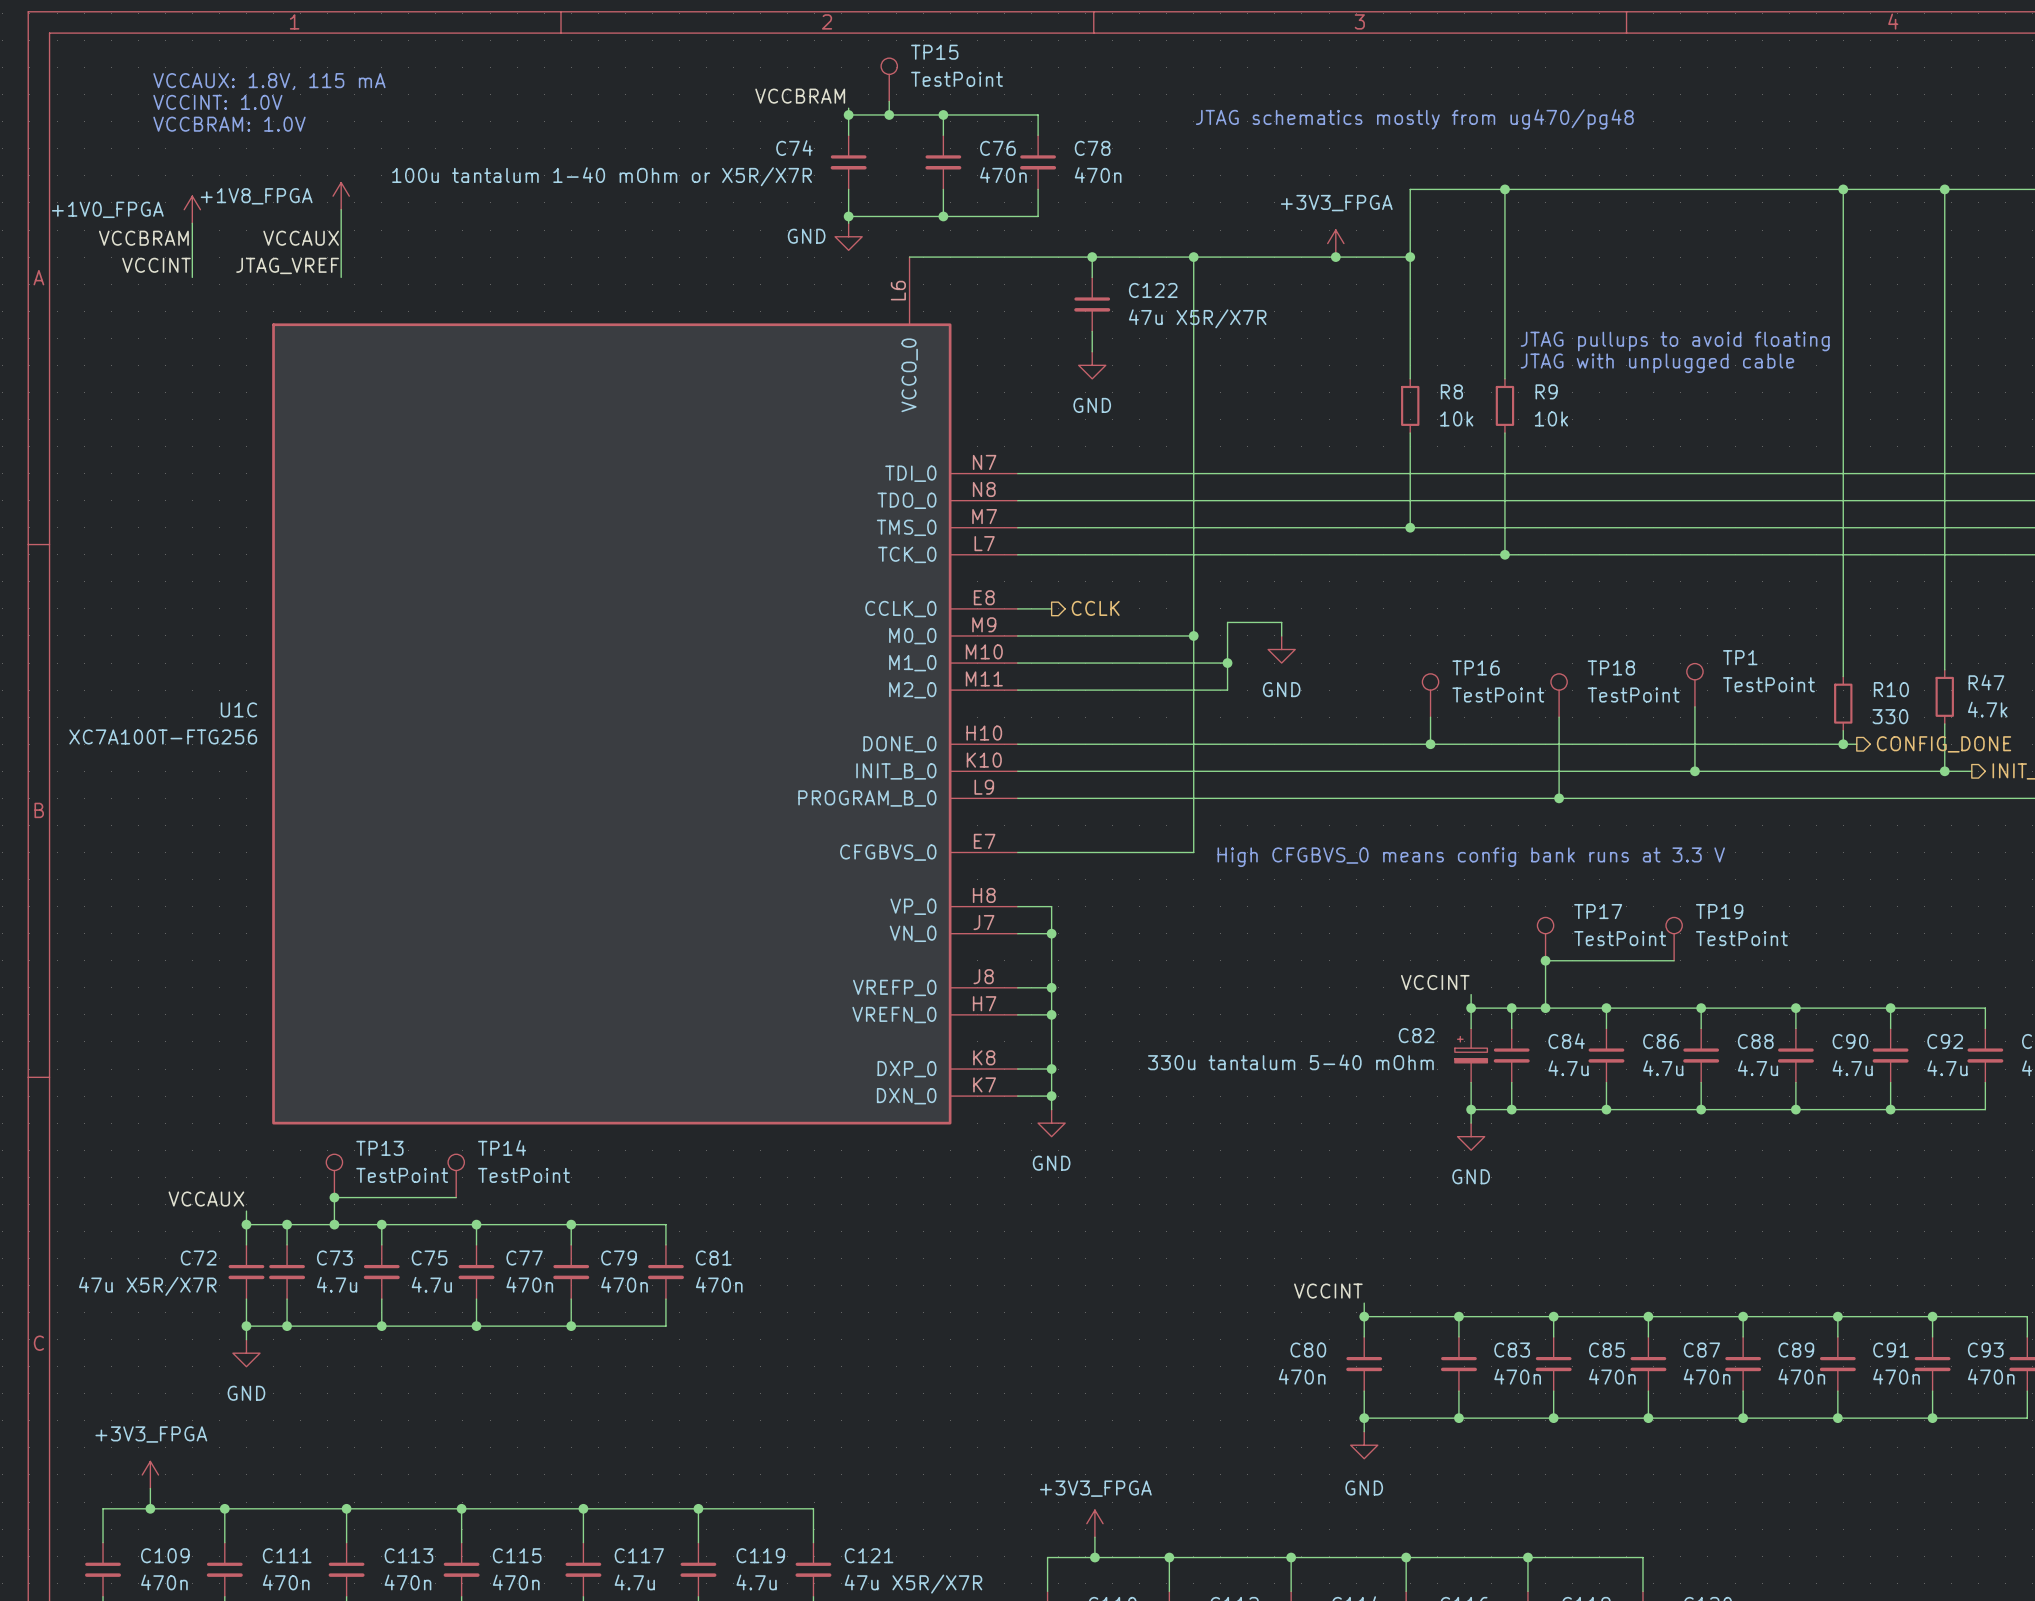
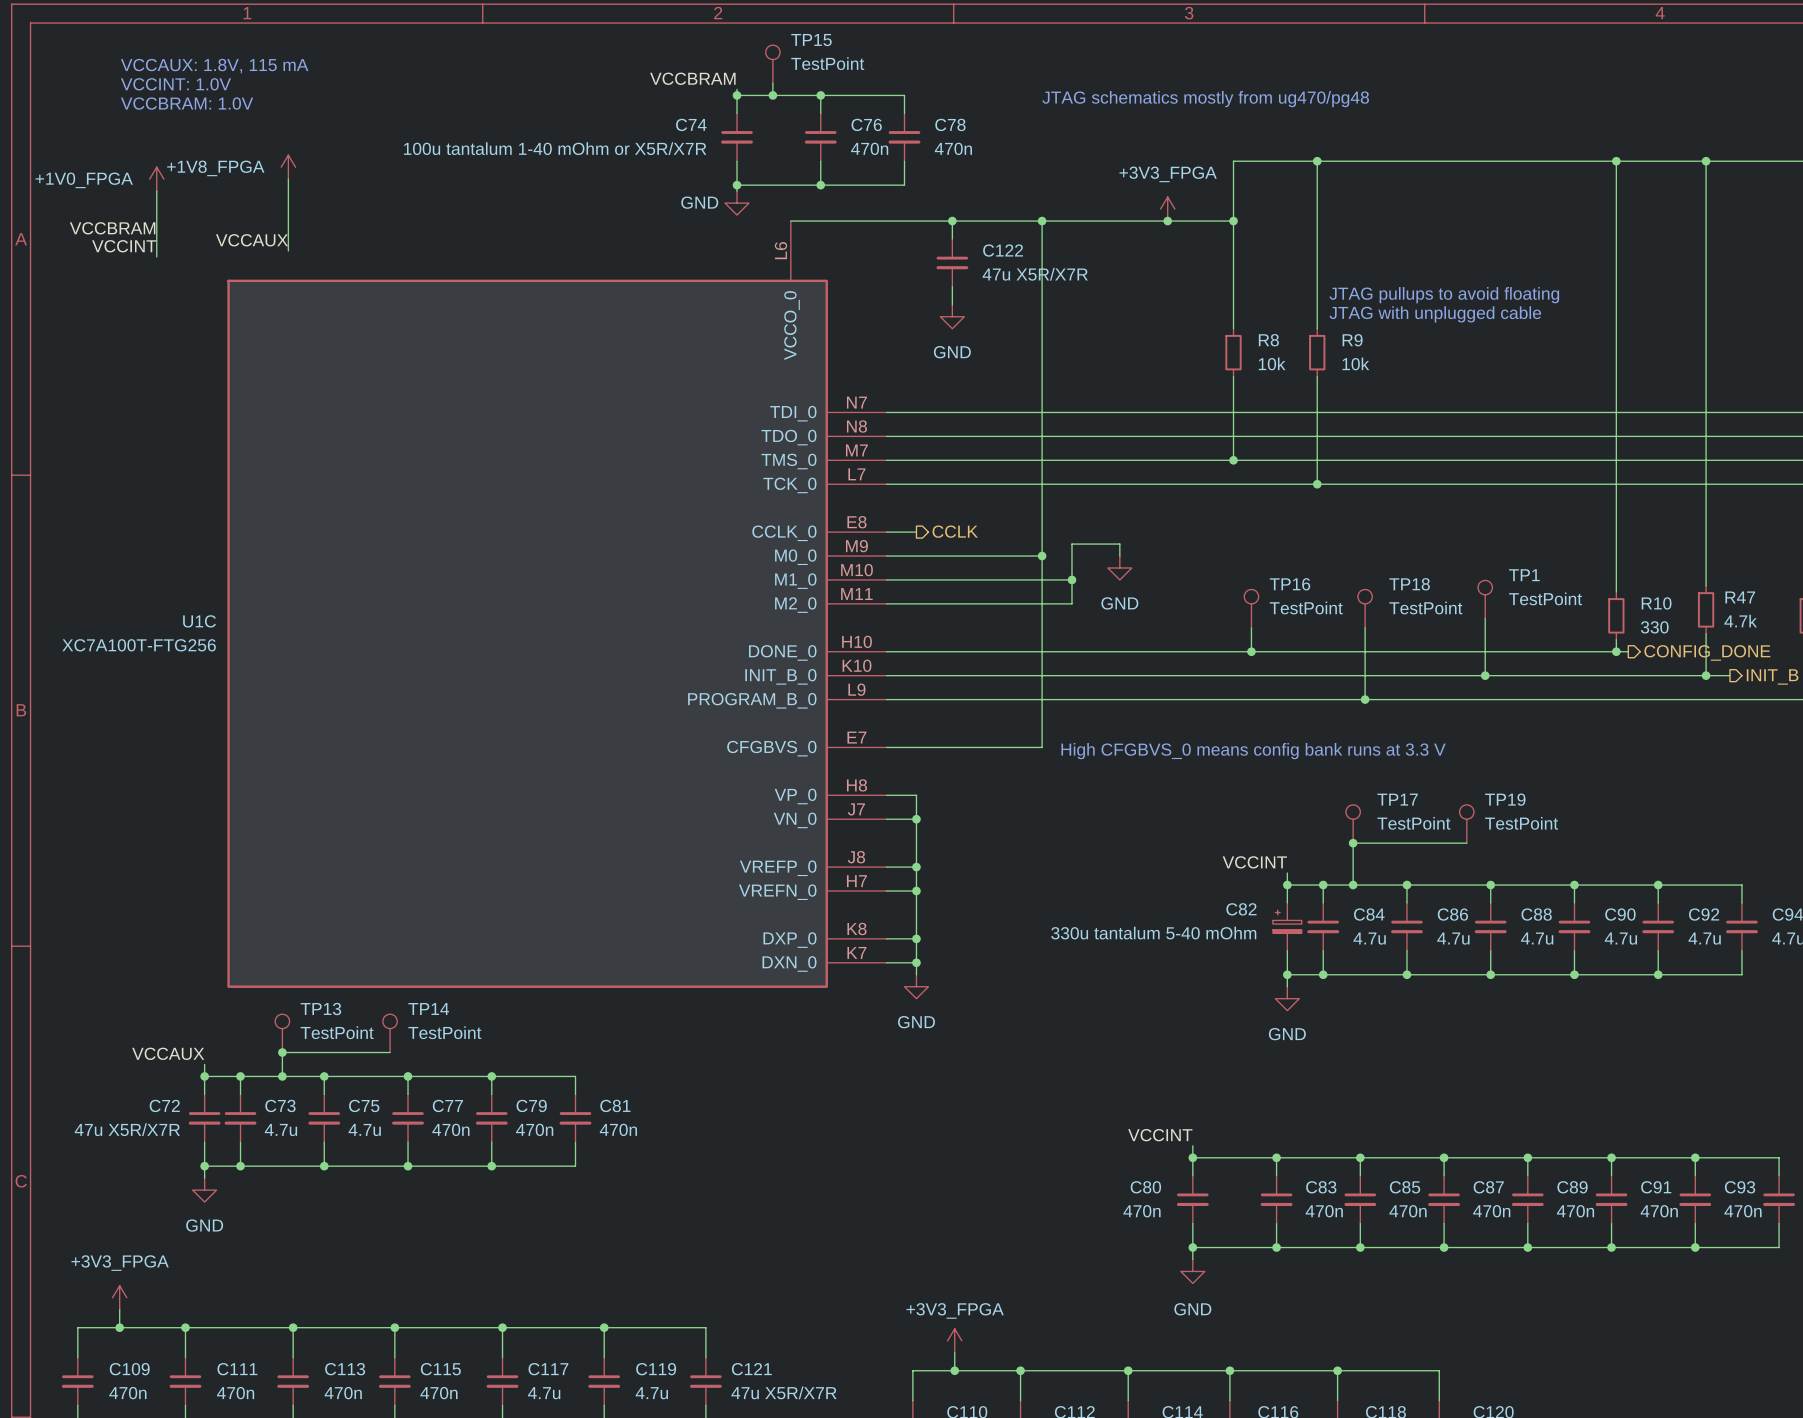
label: VCCBRAM (143, 238) -> none
label position: VCCAUX (301, 238) -> VCCAUX (251, 240)
label: VCCINT (156, 265) -> VCCBRAM (112, 228)
label: JTAG_VREF (287, 265) -> none
wire: none -> (156, 238) (156, 256)
wire: none -> (288, 238) (288, 250)
label: none -> VCCINT (124, 246)

